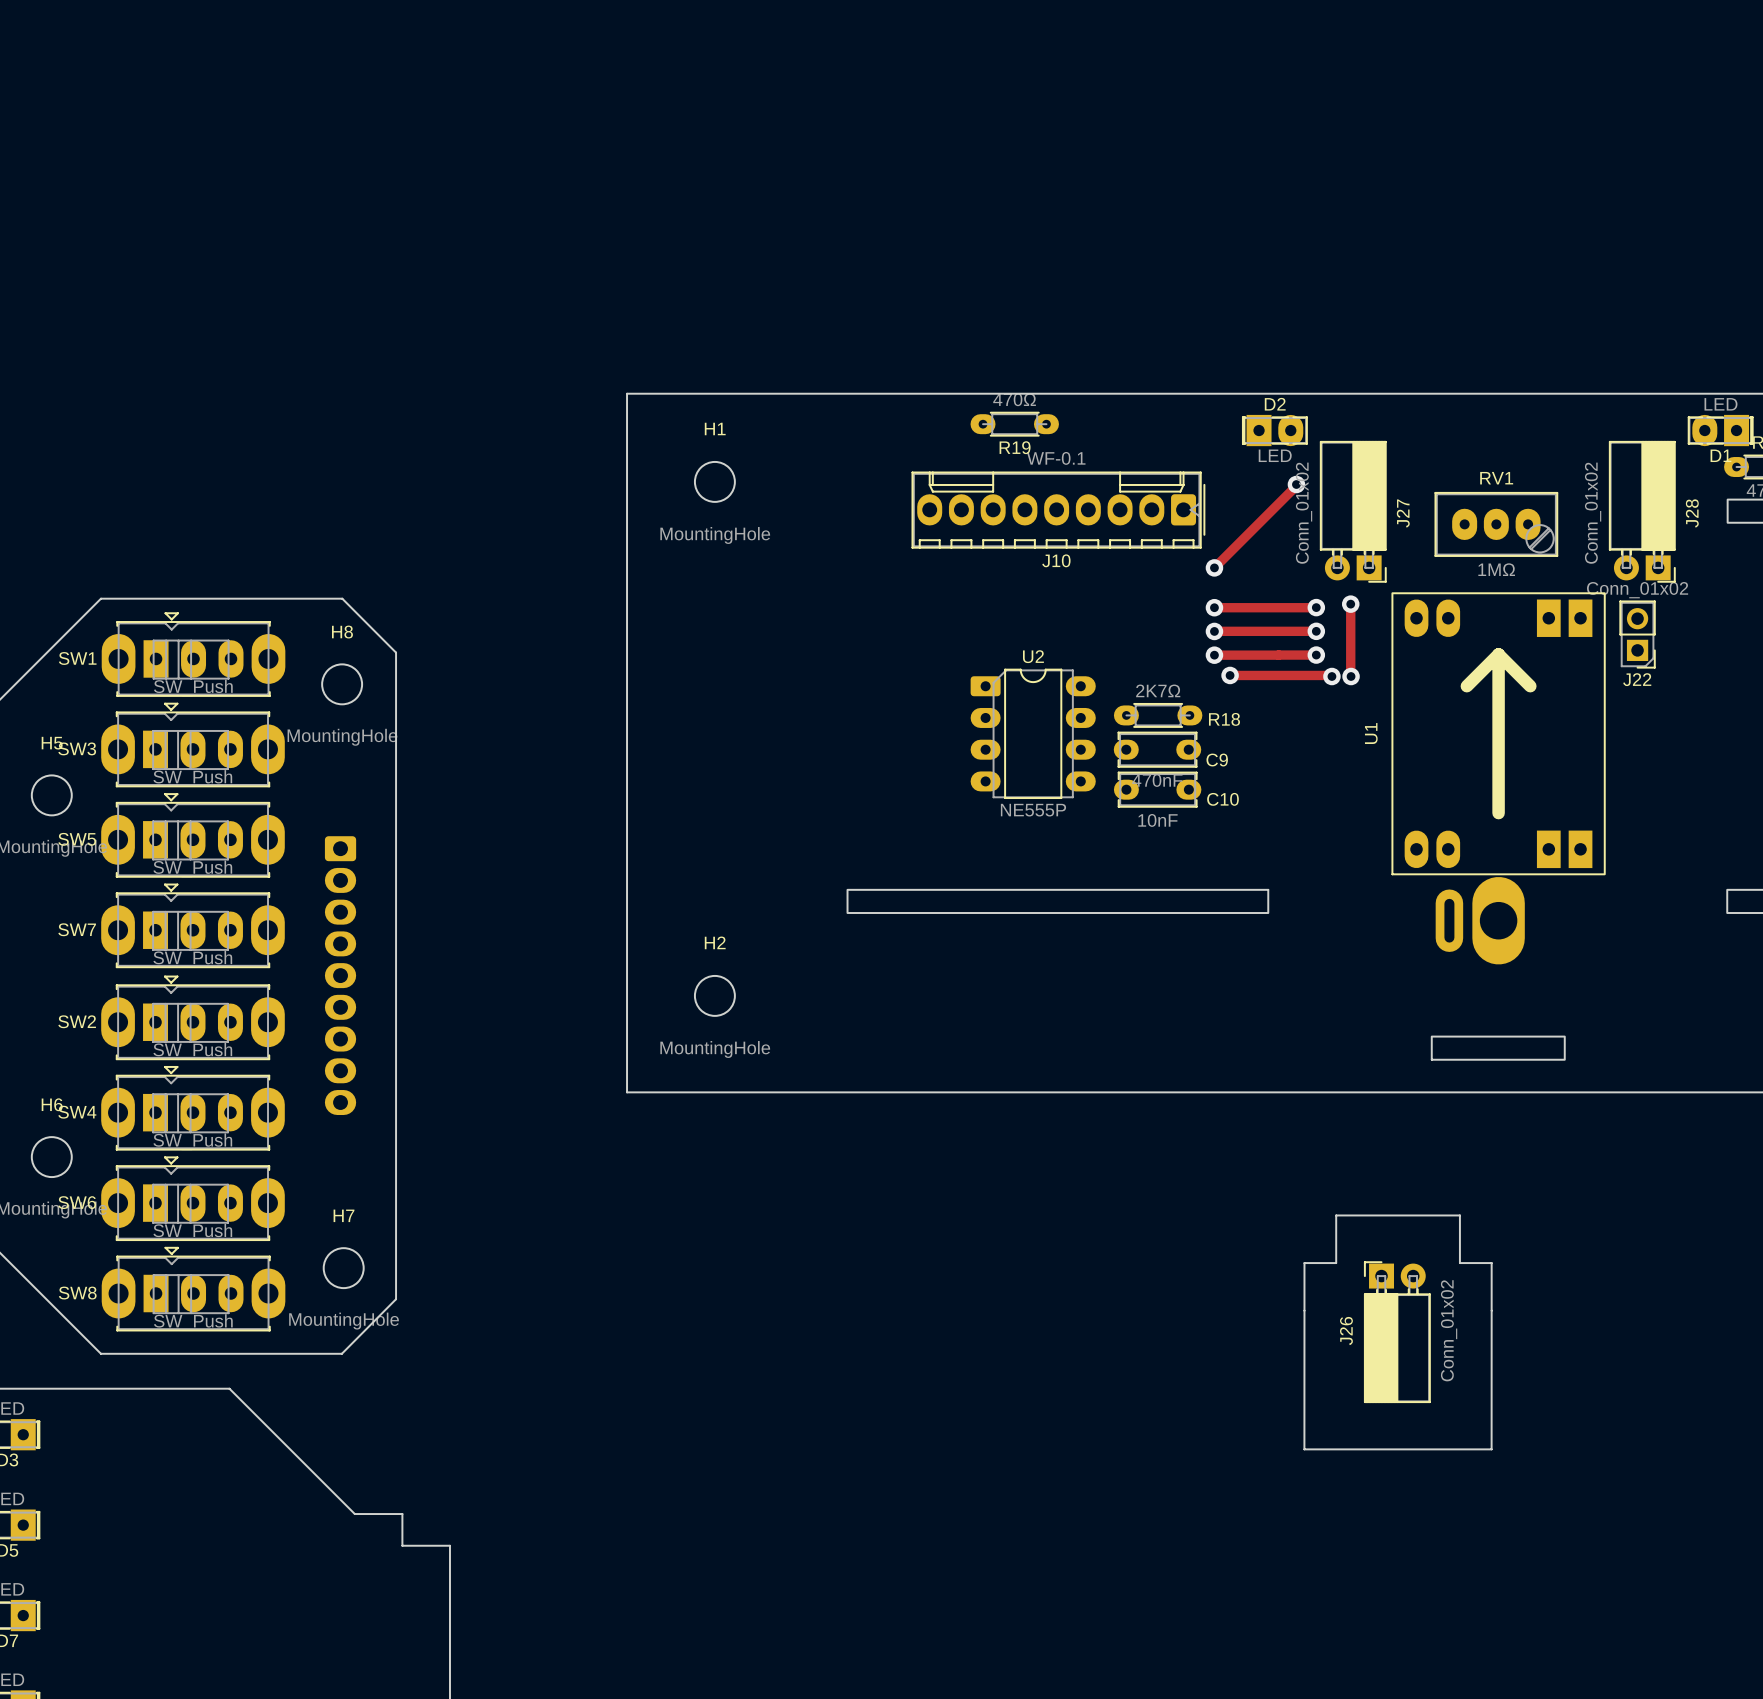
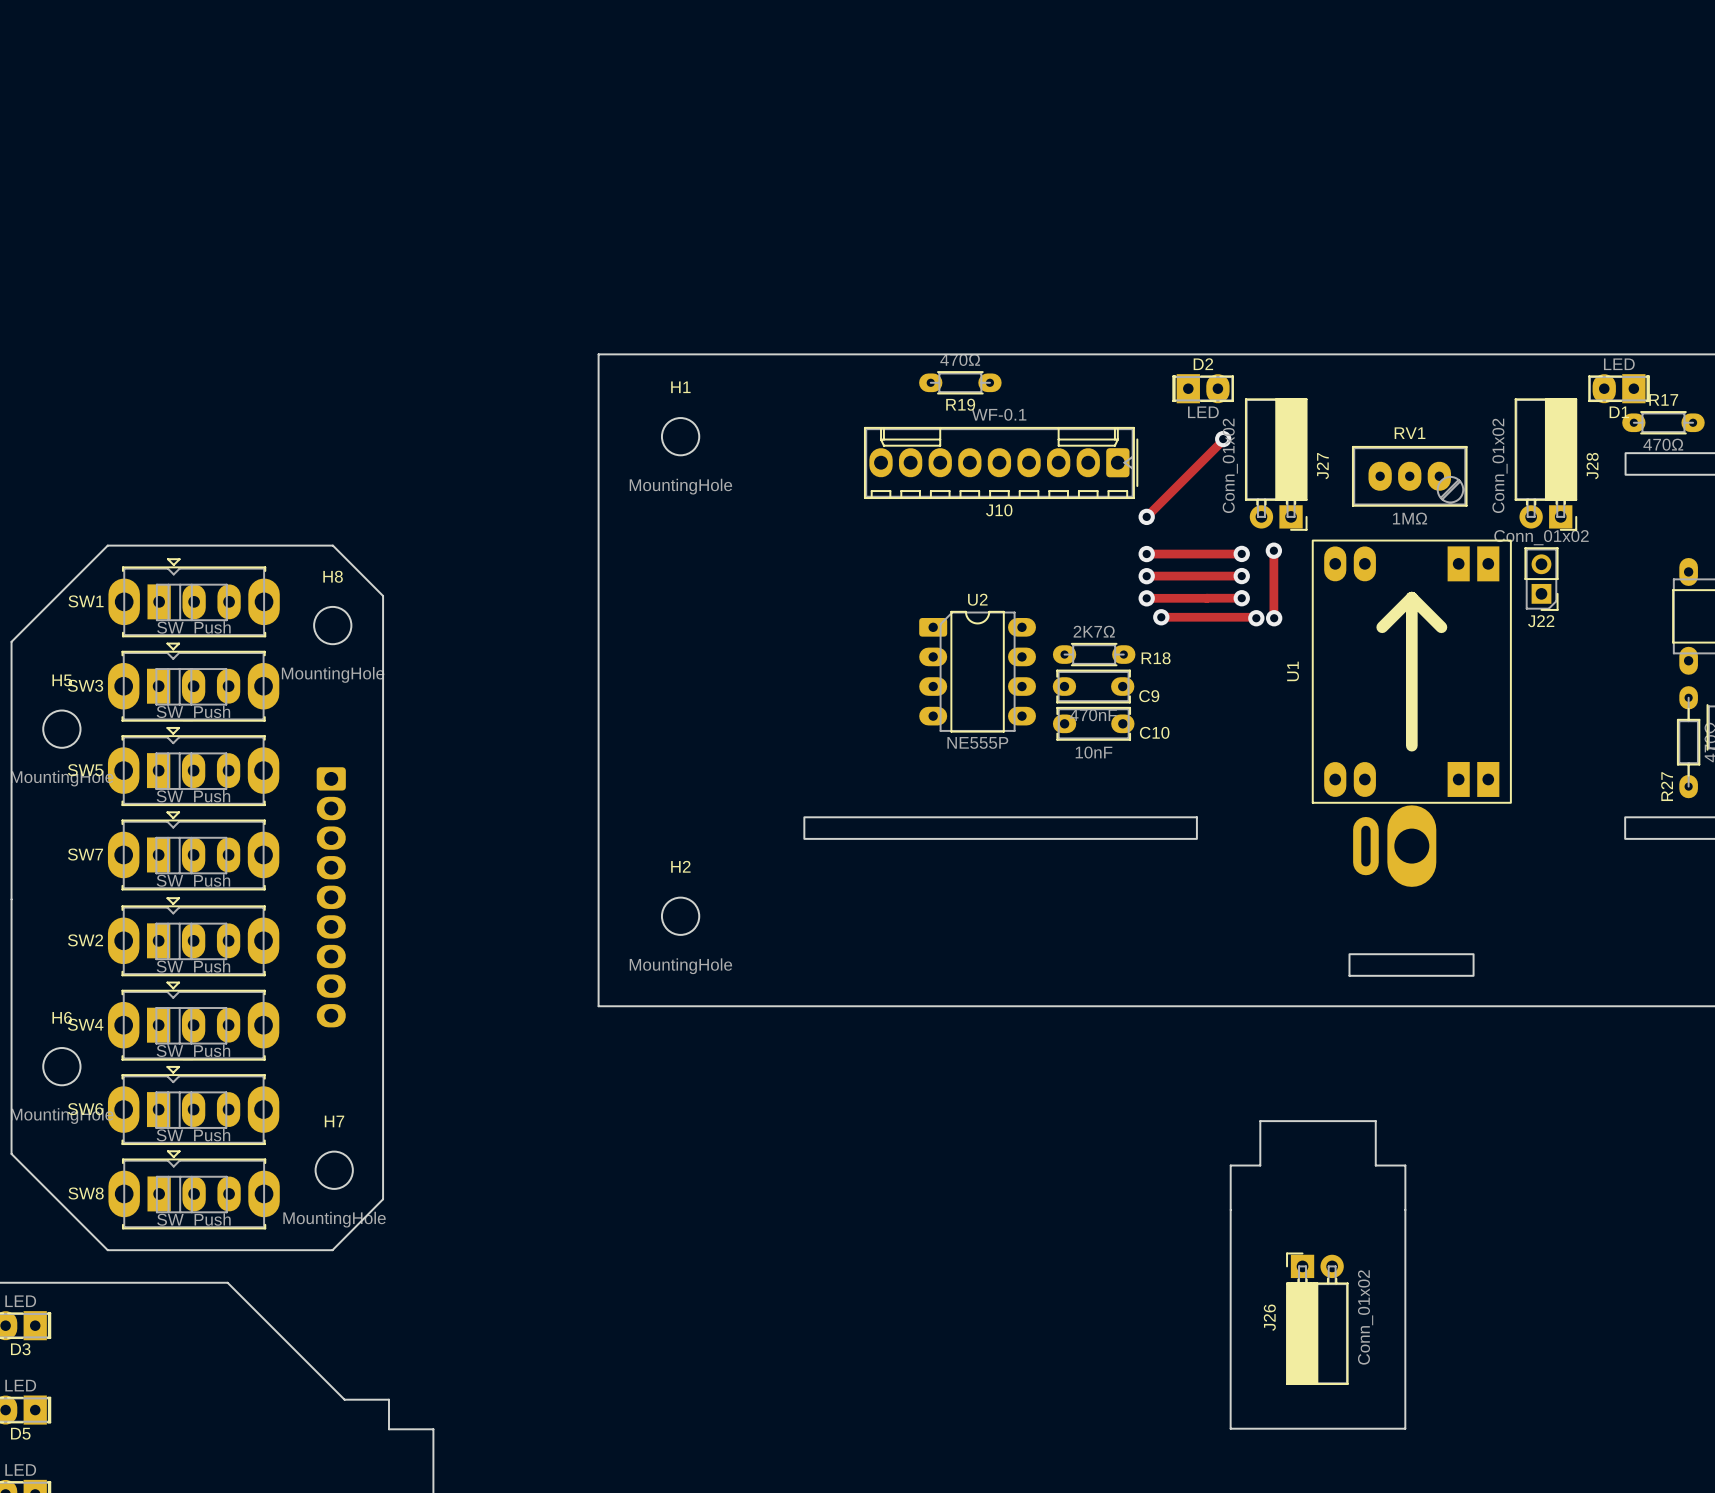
board edge: (1304, 1310) (1304, 1449) (1491, 1449) (1491, 1310) -> (1230, 1209) (1230, 1428) (1405, 1428) (1405, 1209)
J26 position: (1397, 1332) -> (1317, 1318)

